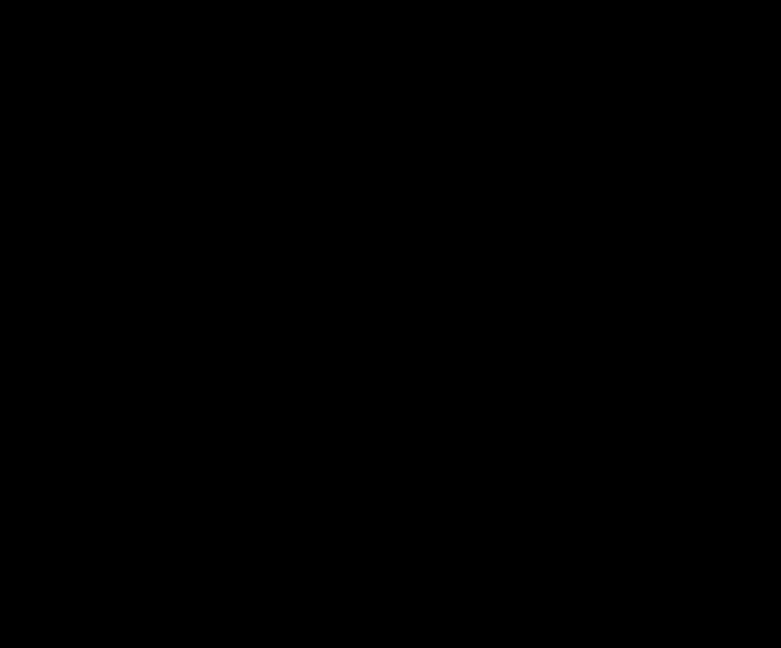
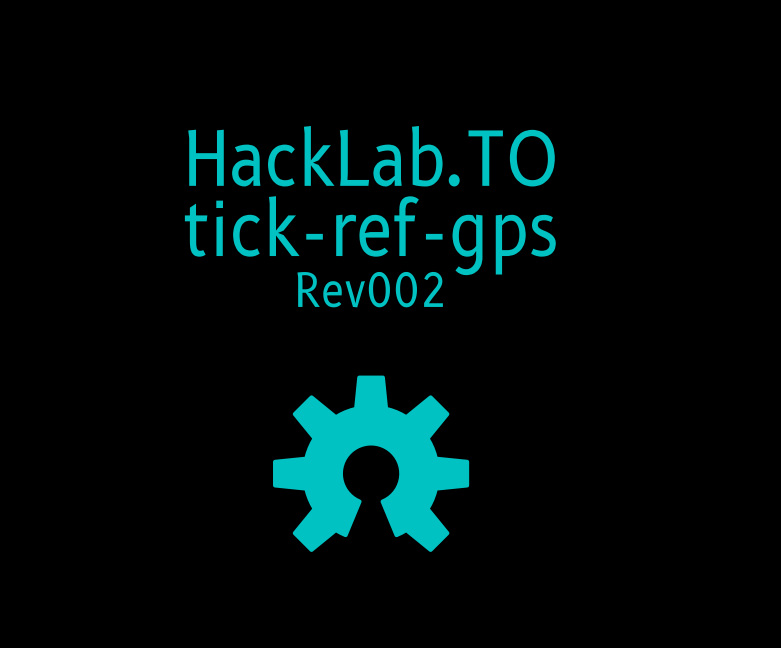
text: none -> HackLab.TO (371, 156)
text: none -> tick-ref-gps (370, 235)
text: none -> Rev002 (370, 289)
drawing: none -> [273, 375, 470, 552]

